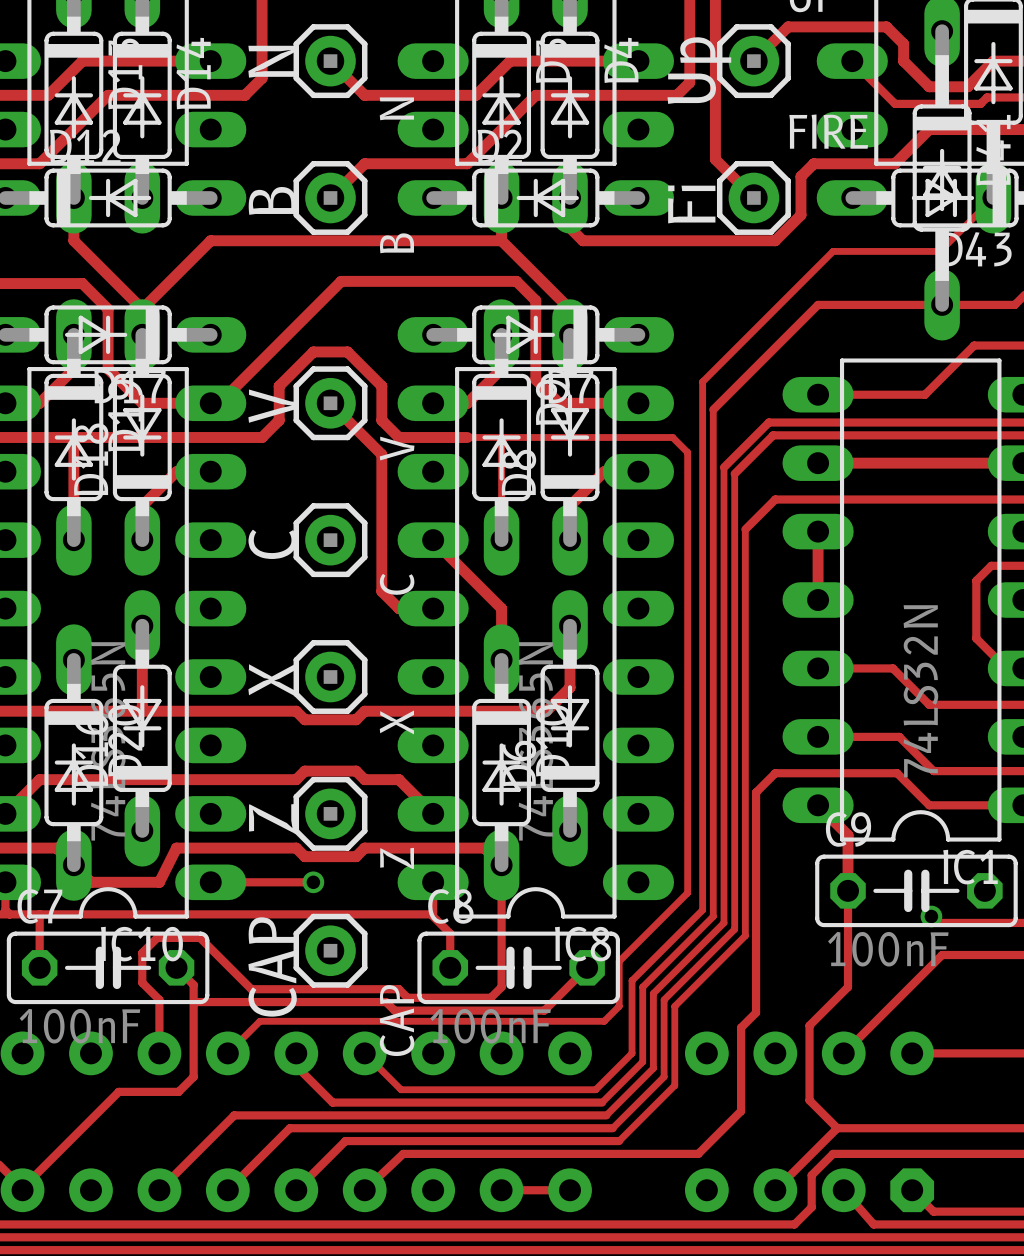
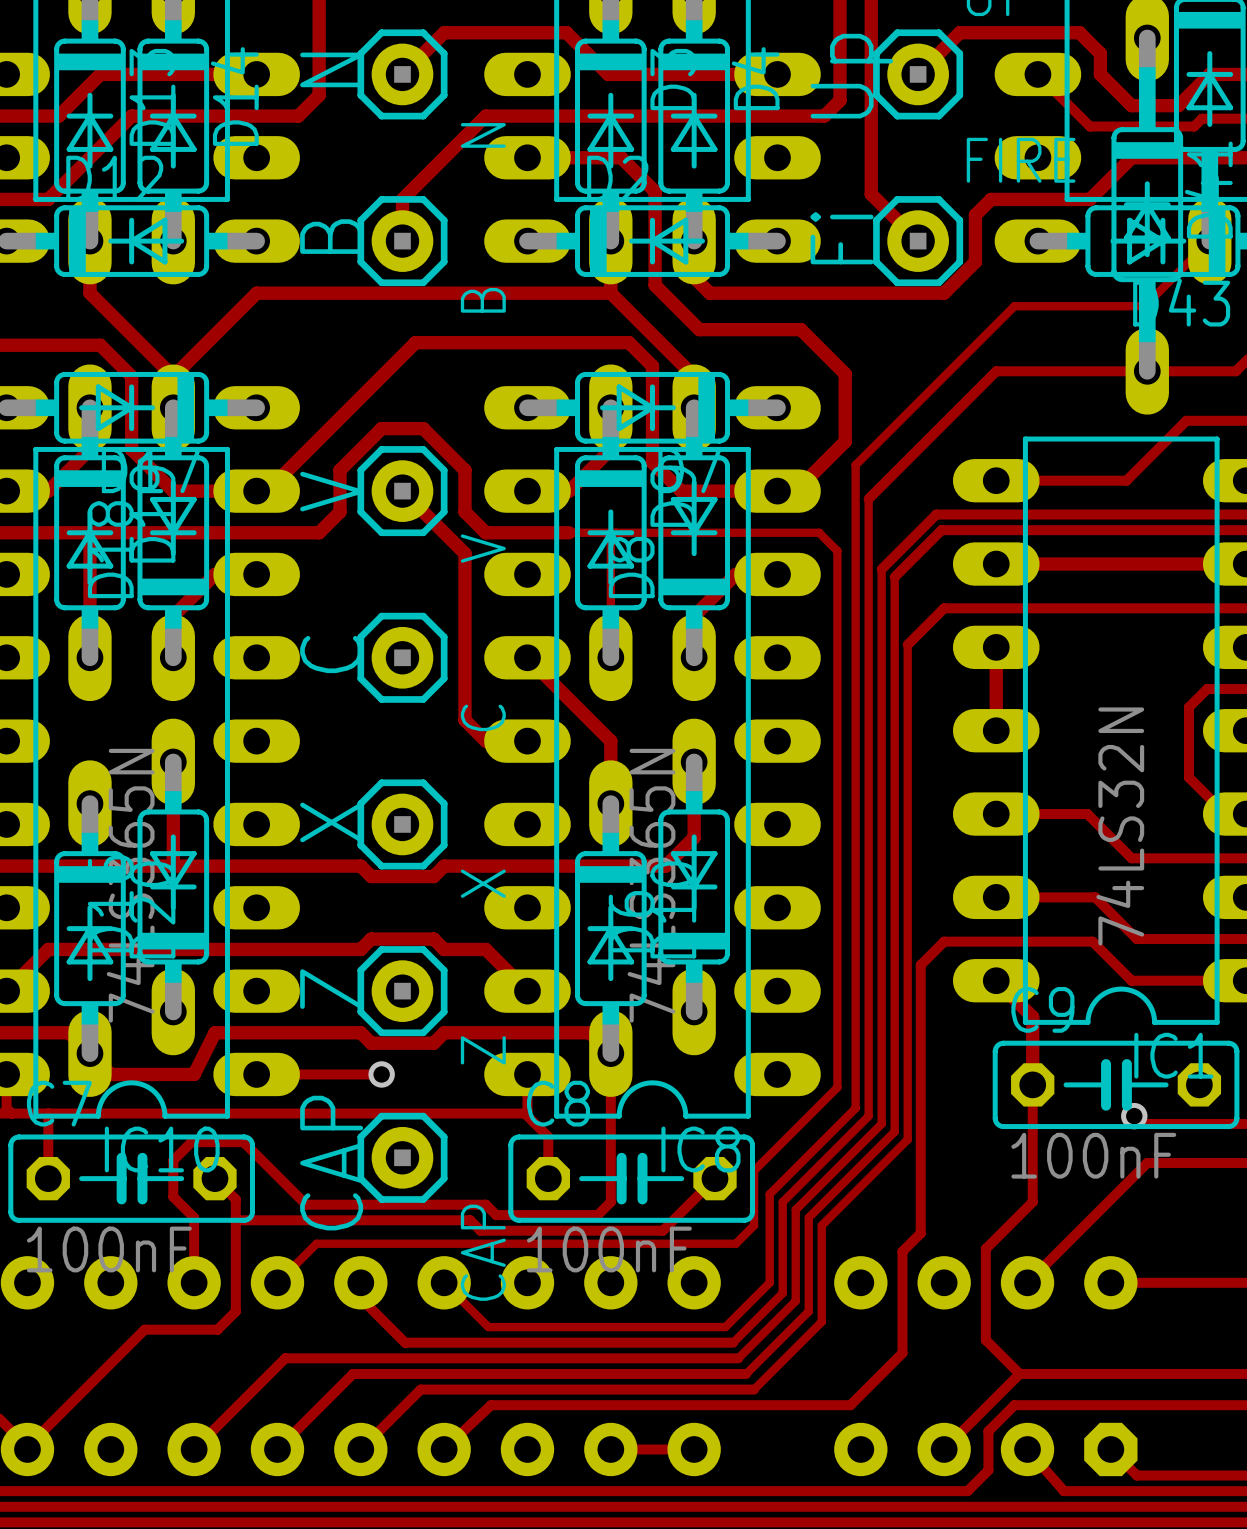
track: (330, 61) (364, 95) (398, 95) -> (402, 74) (444, 32) (566, 32) (608, 74) (621, 74)
track: (510, 61) (475, 95) -> (652, 116) (579, 116)
track: (535, 95) (467, 163) (364, 163) (330, 197) -> (485, 116) (402, 199) (402, 241)
track: none -> (527, 157) (621, 157) (655, 191) (655, 285) (699, 329) (800, 329) (845, 373) (845, 441) (795, 491) (777, 491)

